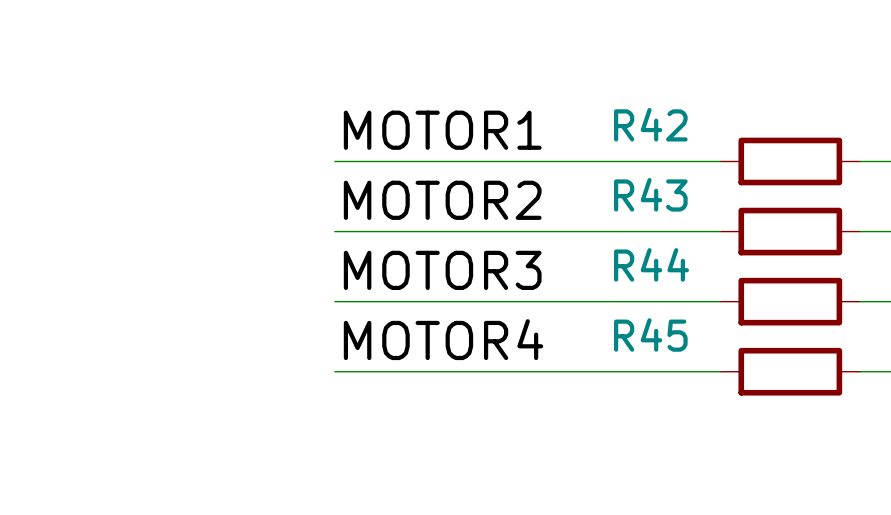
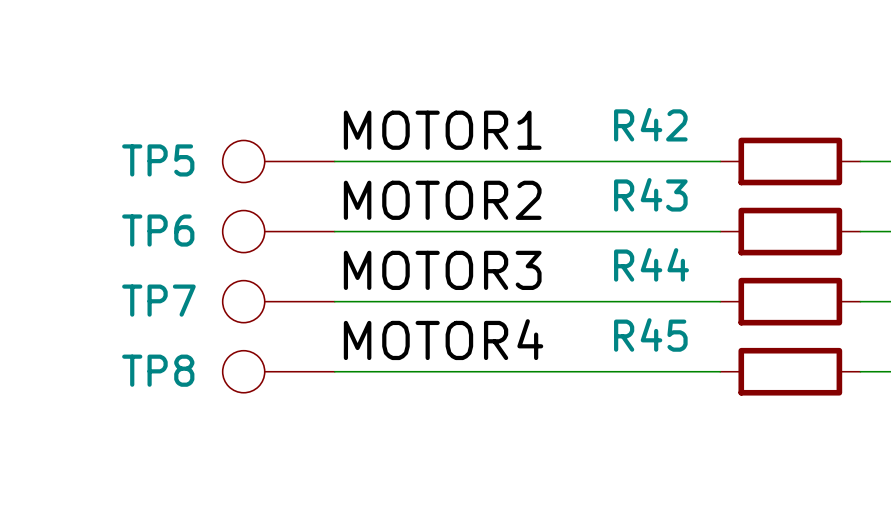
TP5: none -> (278, 161)
TP6: none -> (278, 231)
TP7: none -> (278, 301)
TP8: none -> (278, 371)

